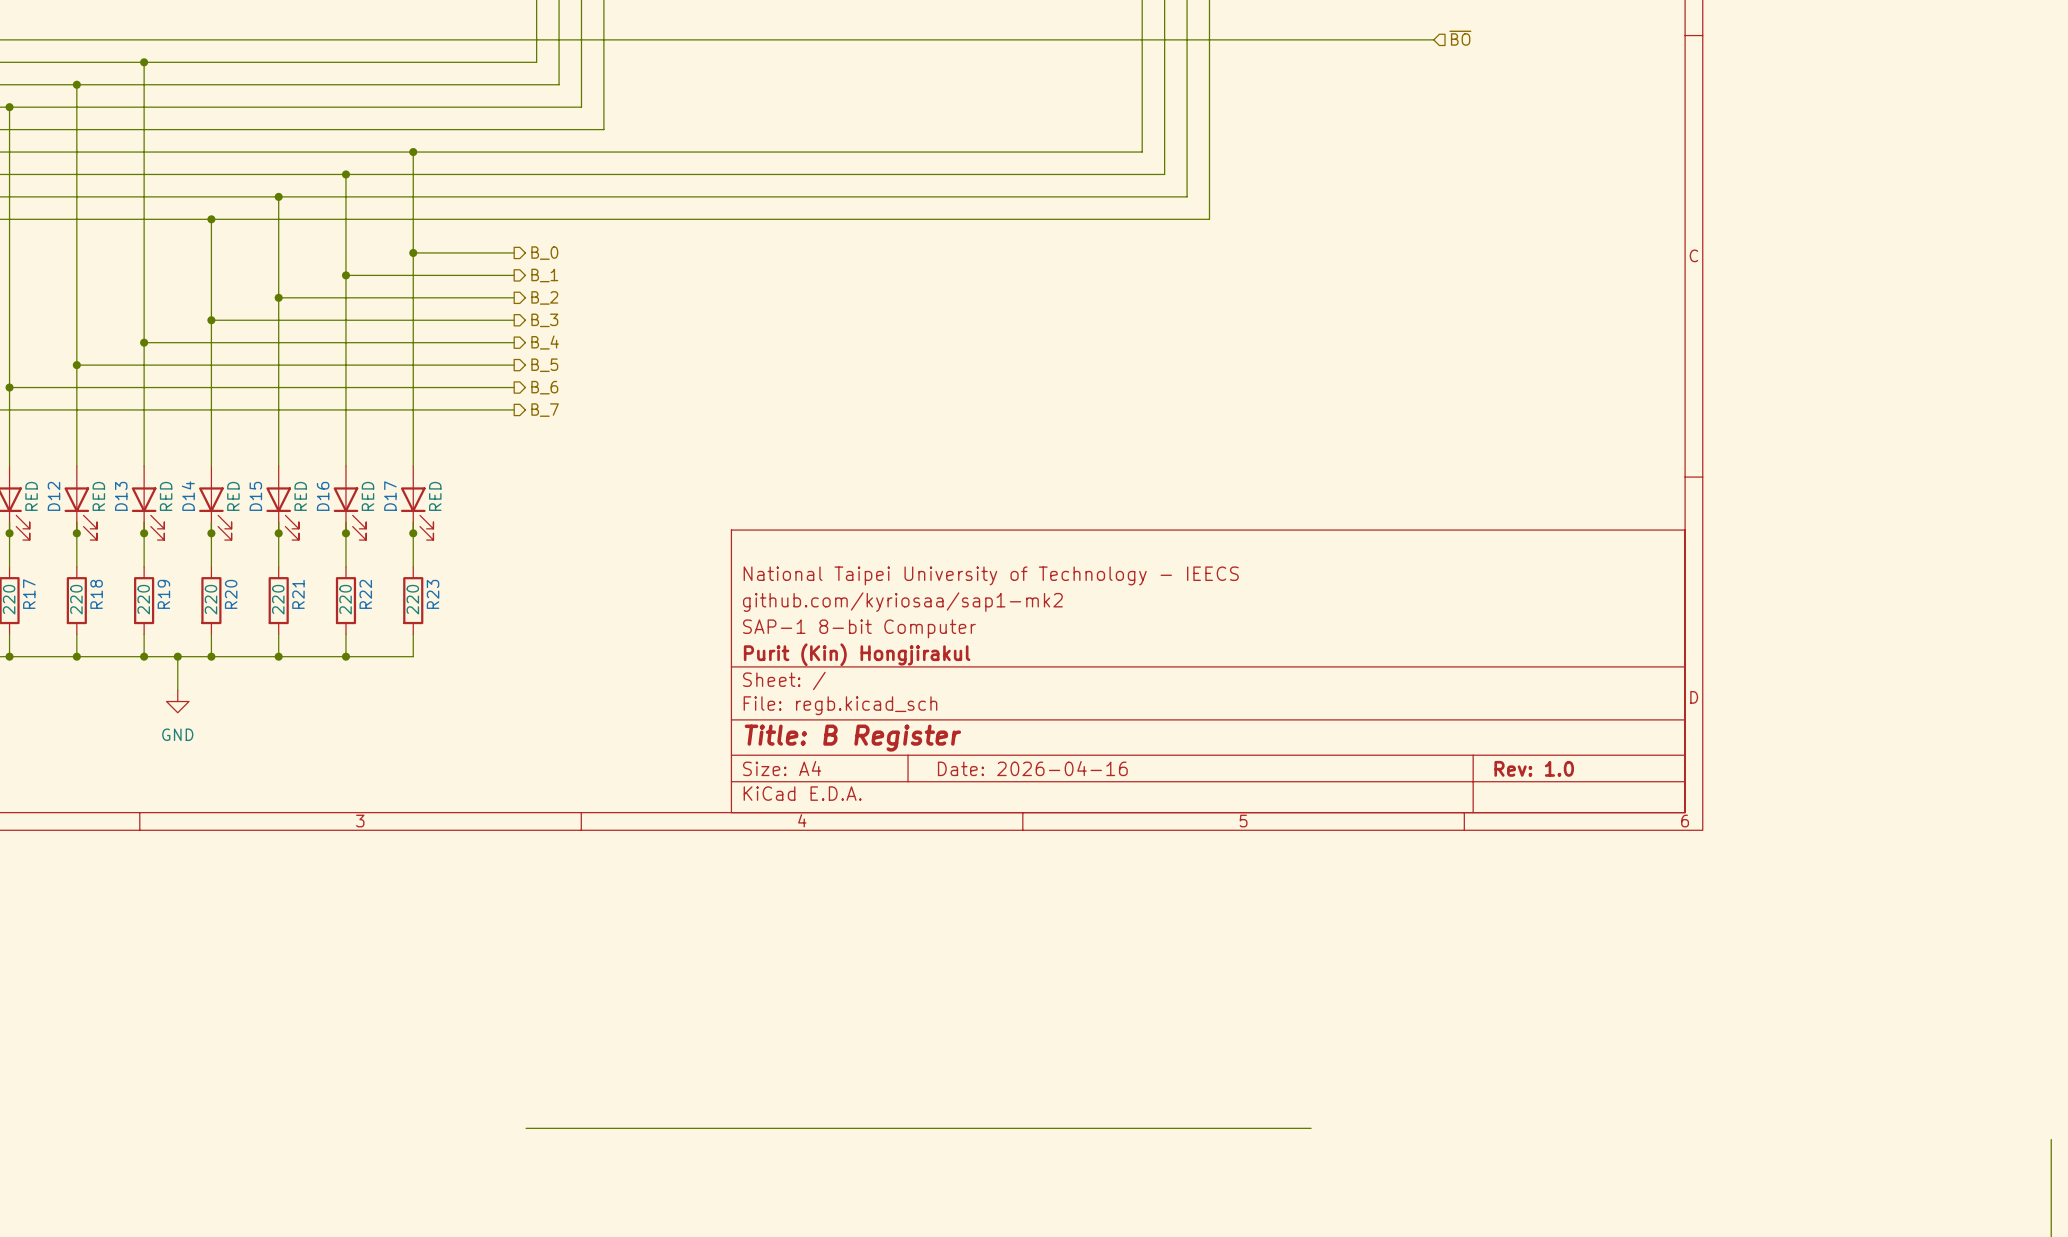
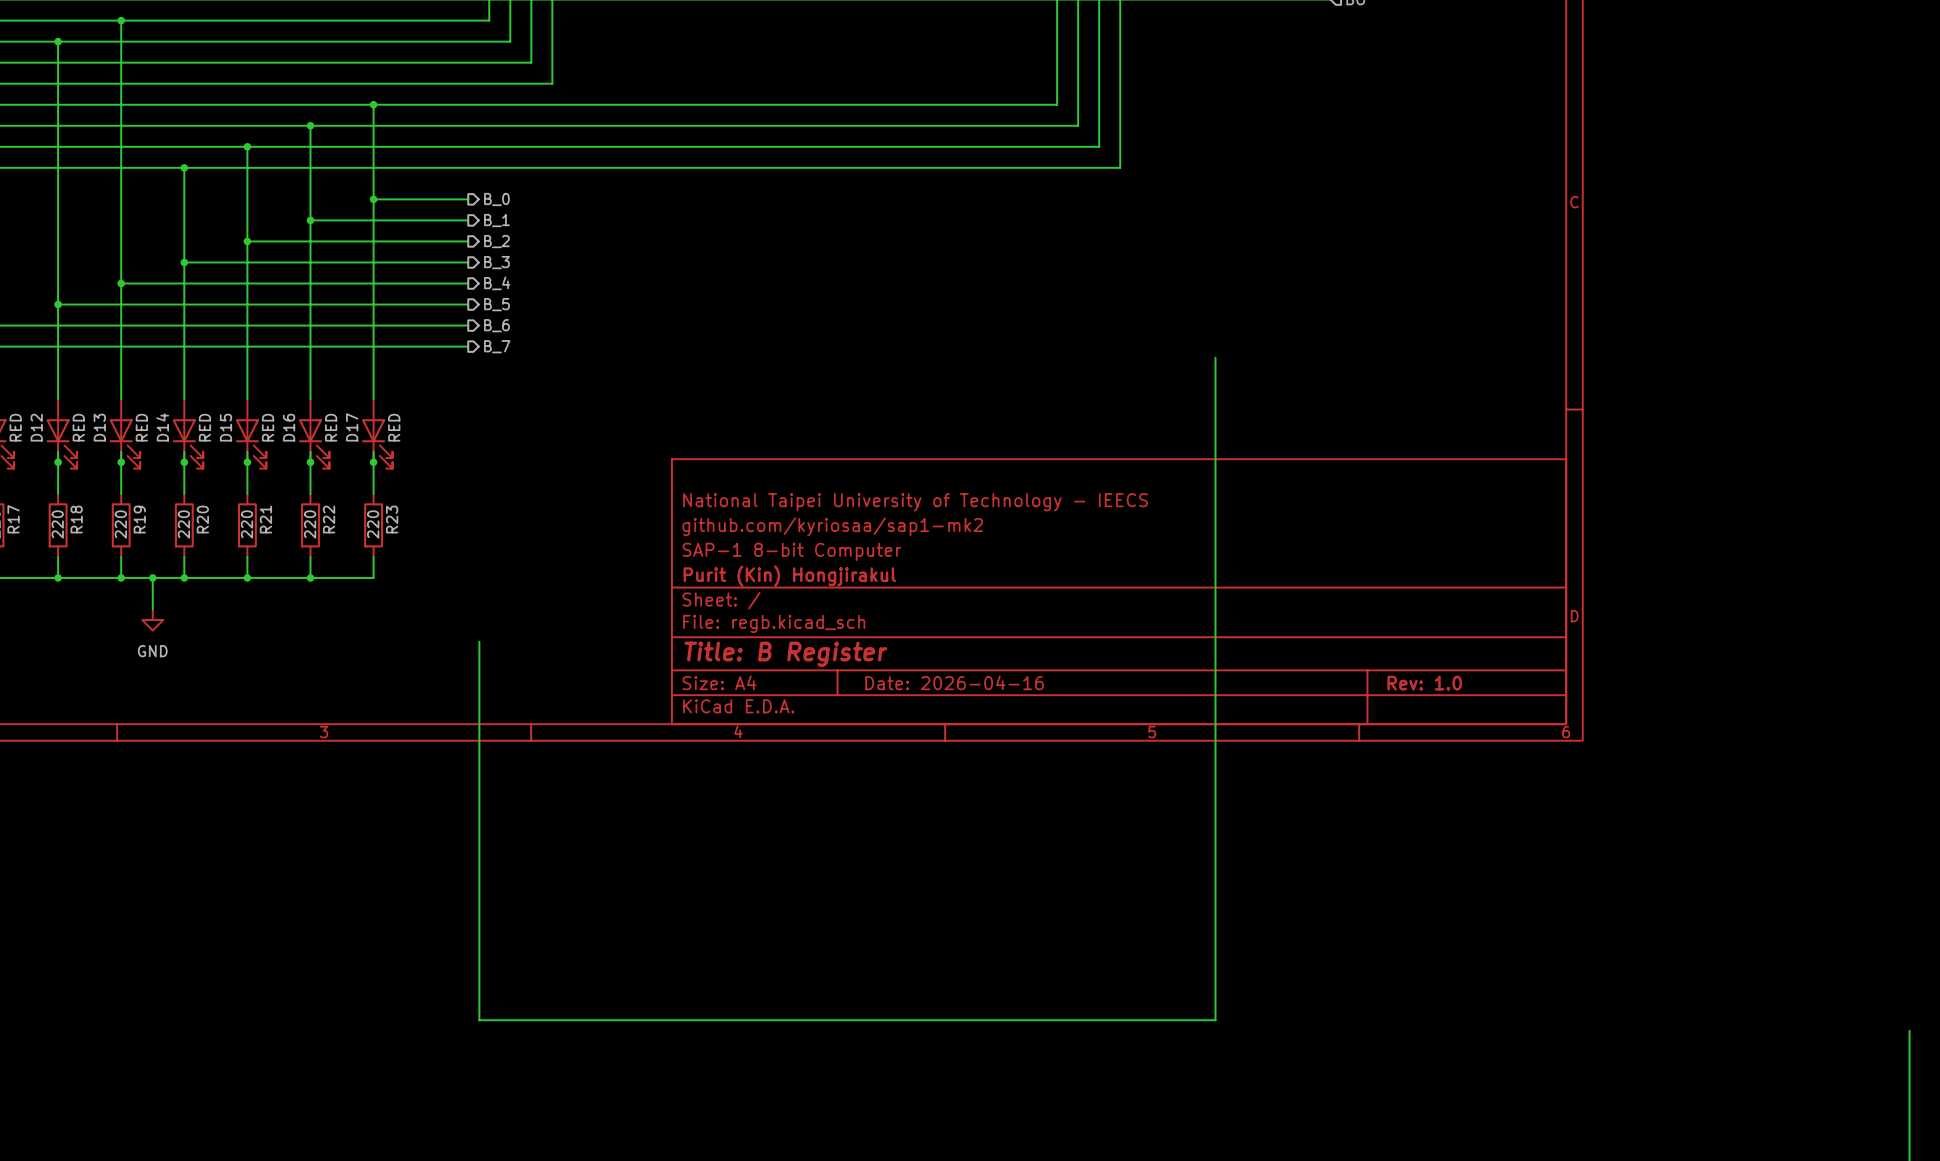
wire: none -> (1215, 357) (1215, 1020)
wire: none -> (479, 641) (479, 1020)

